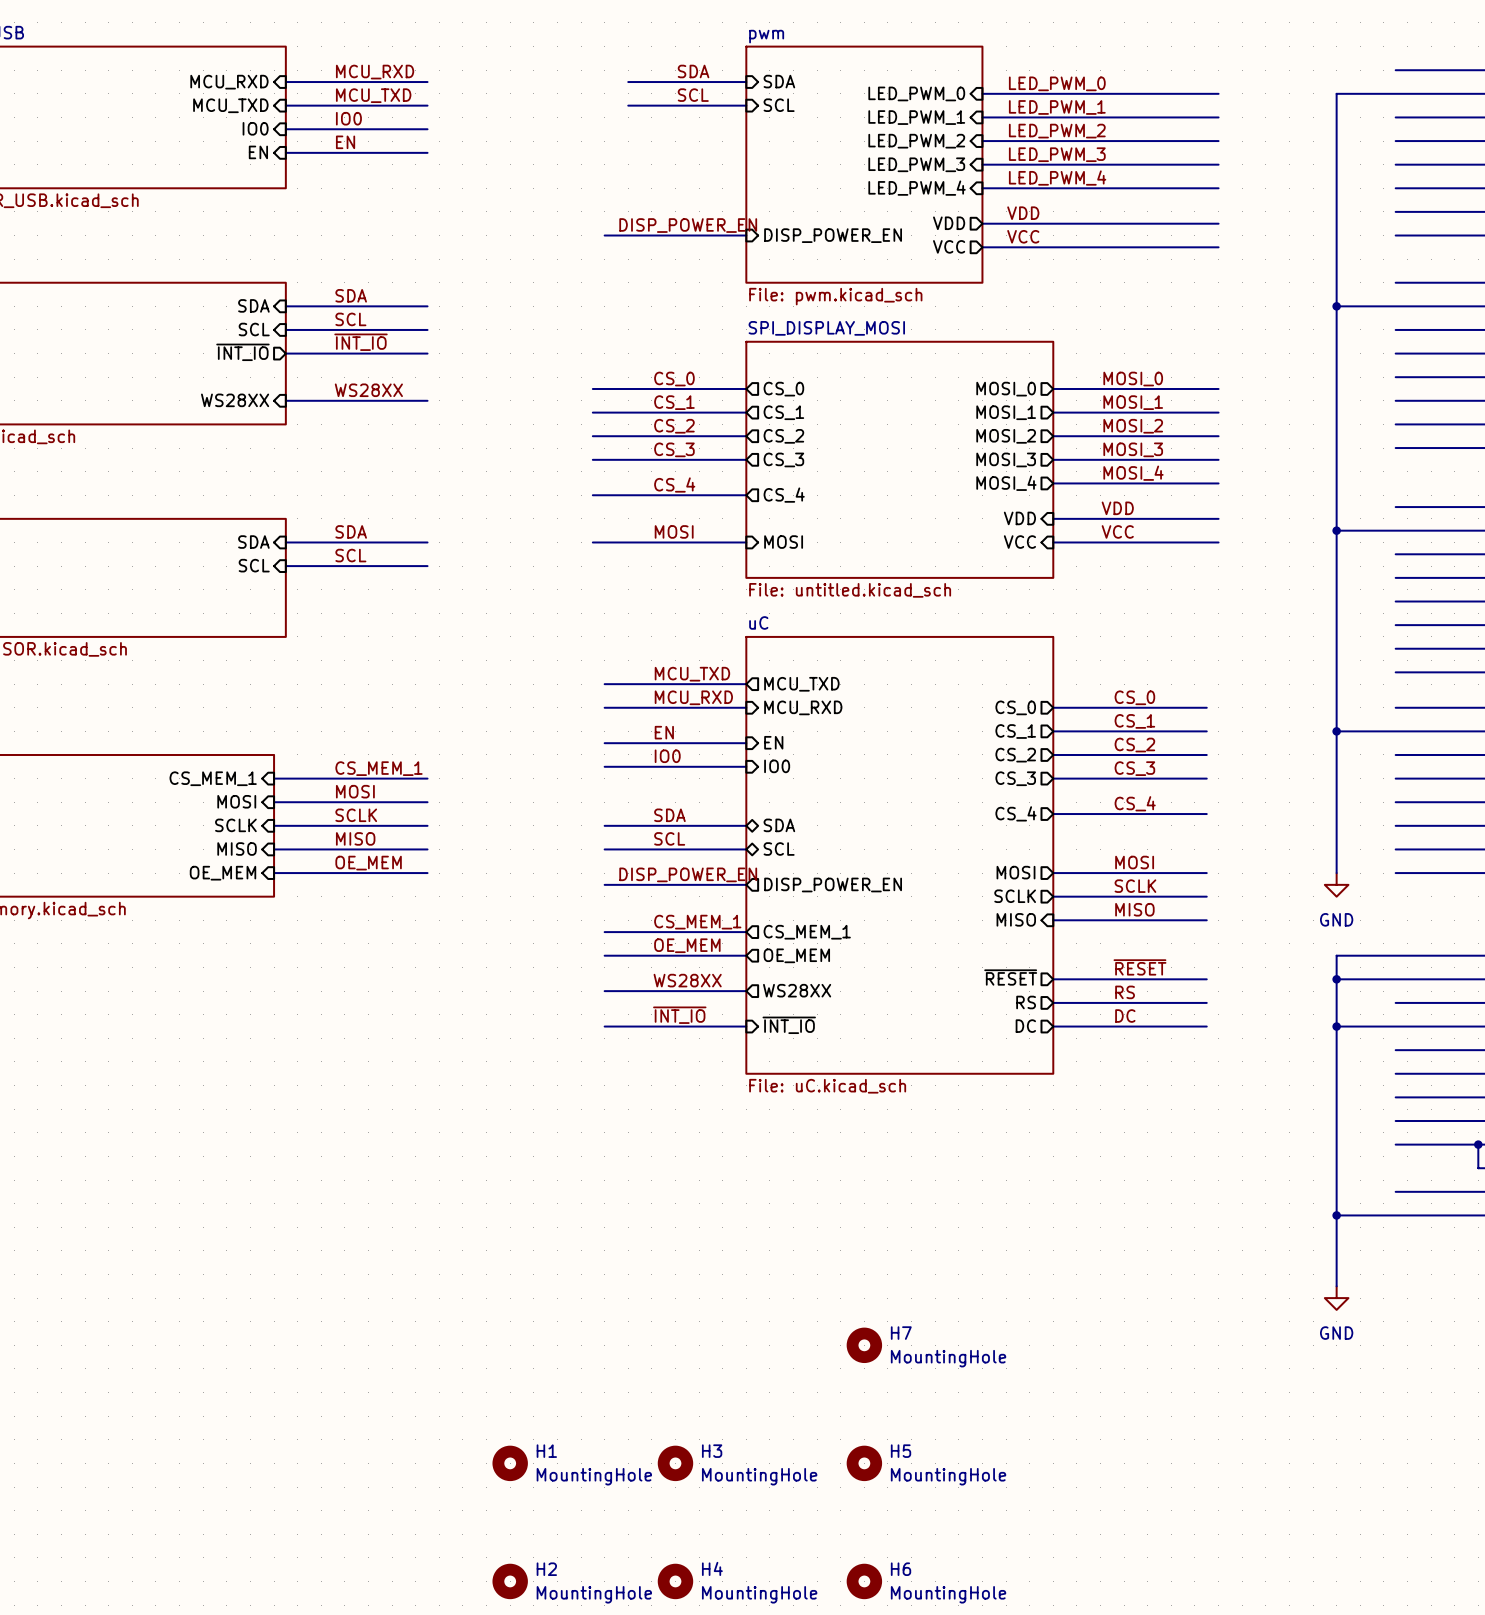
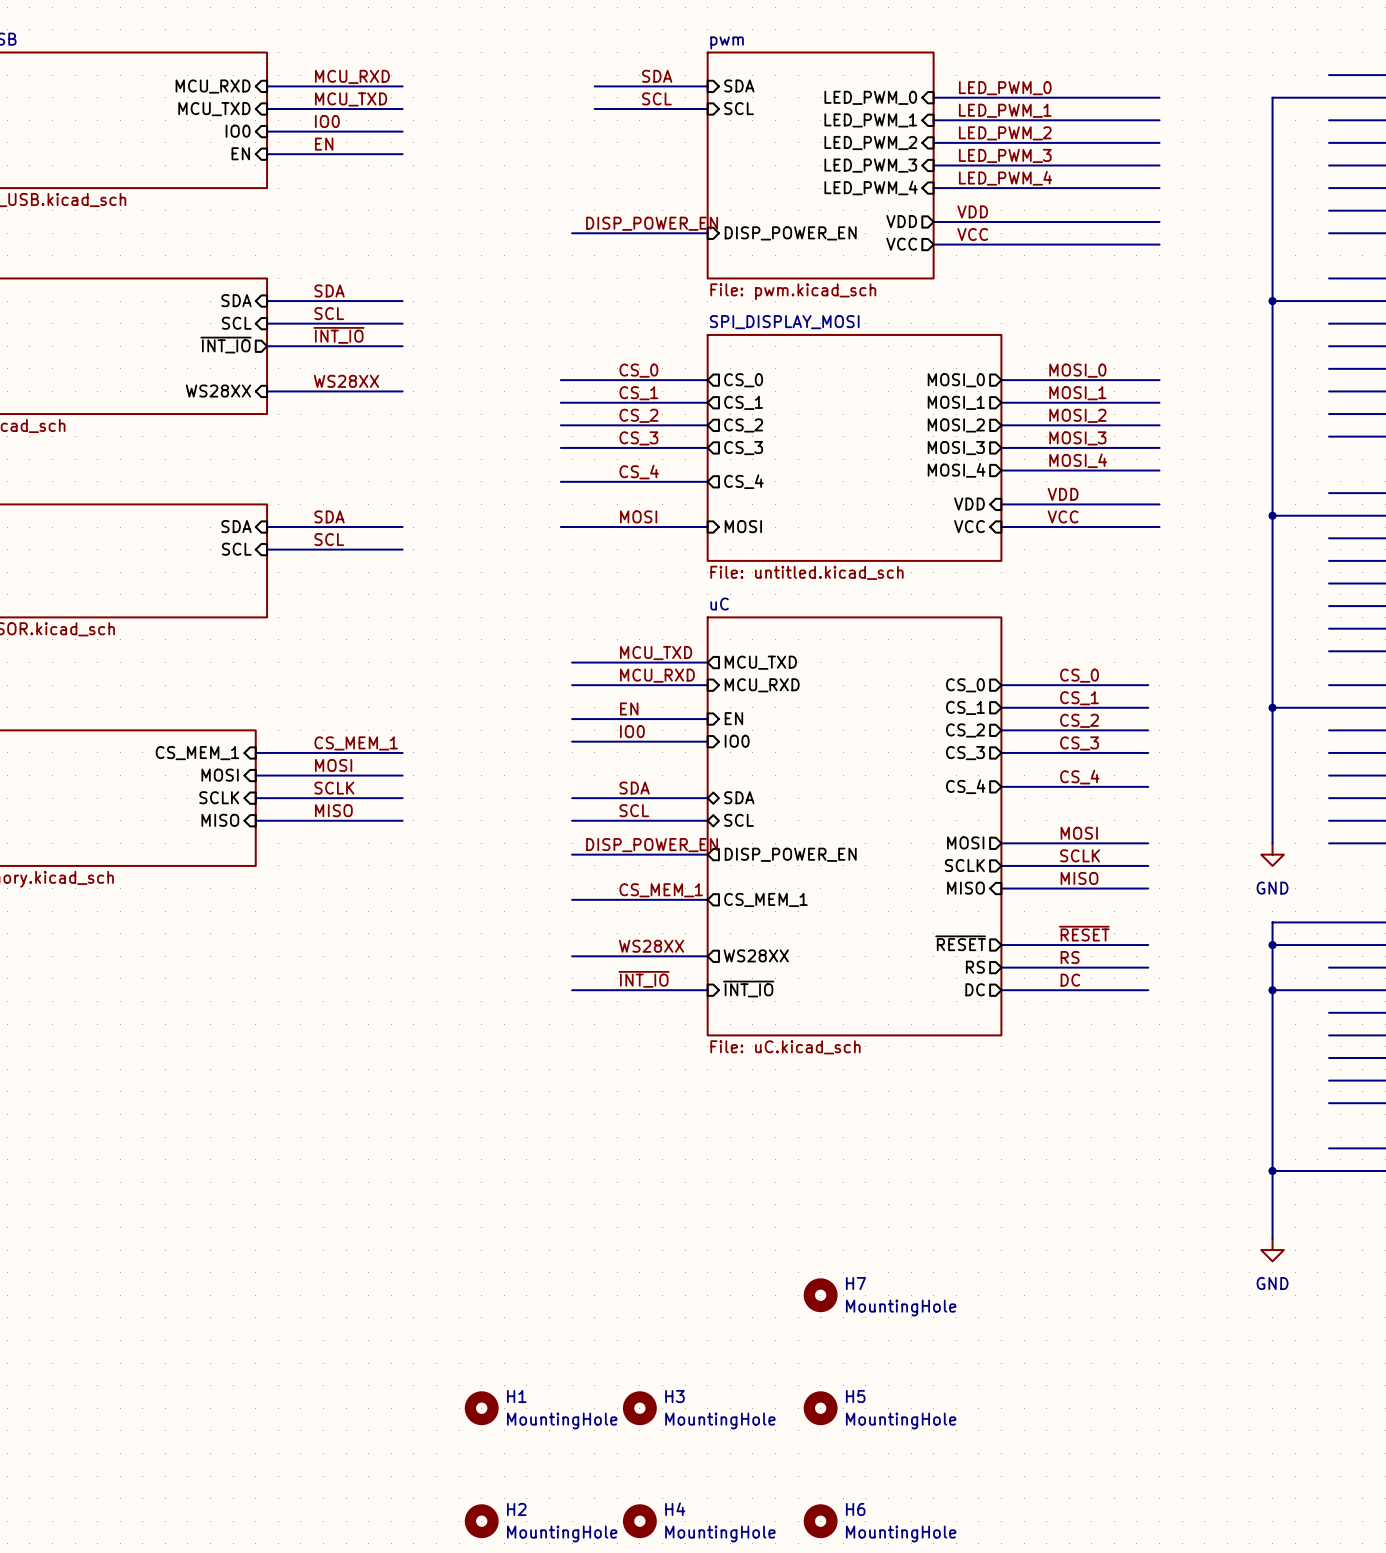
label: OE_MEM (368, 863) -> none
sheet pin: OE_MEM (222, 873) -> none
wire: (274, 873) (427, 873) -> none
label: OE_MEM (687, 945) -> none
wire: (604, 955) (746, 955) -> none
sheet pin: OE_MEM (796, 955) -> none

